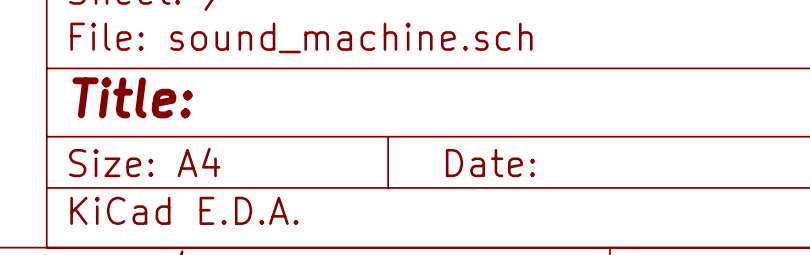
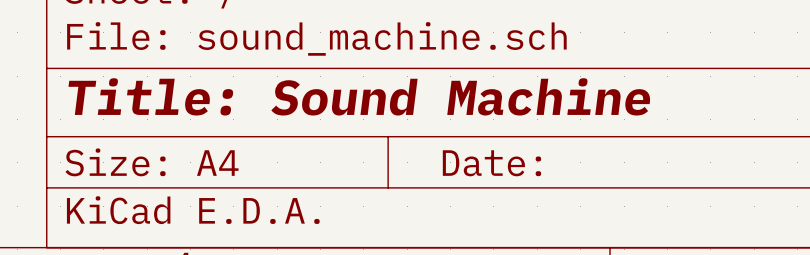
title block: Title: (132, 97) -> Title: Sound Machine (359, 96)

